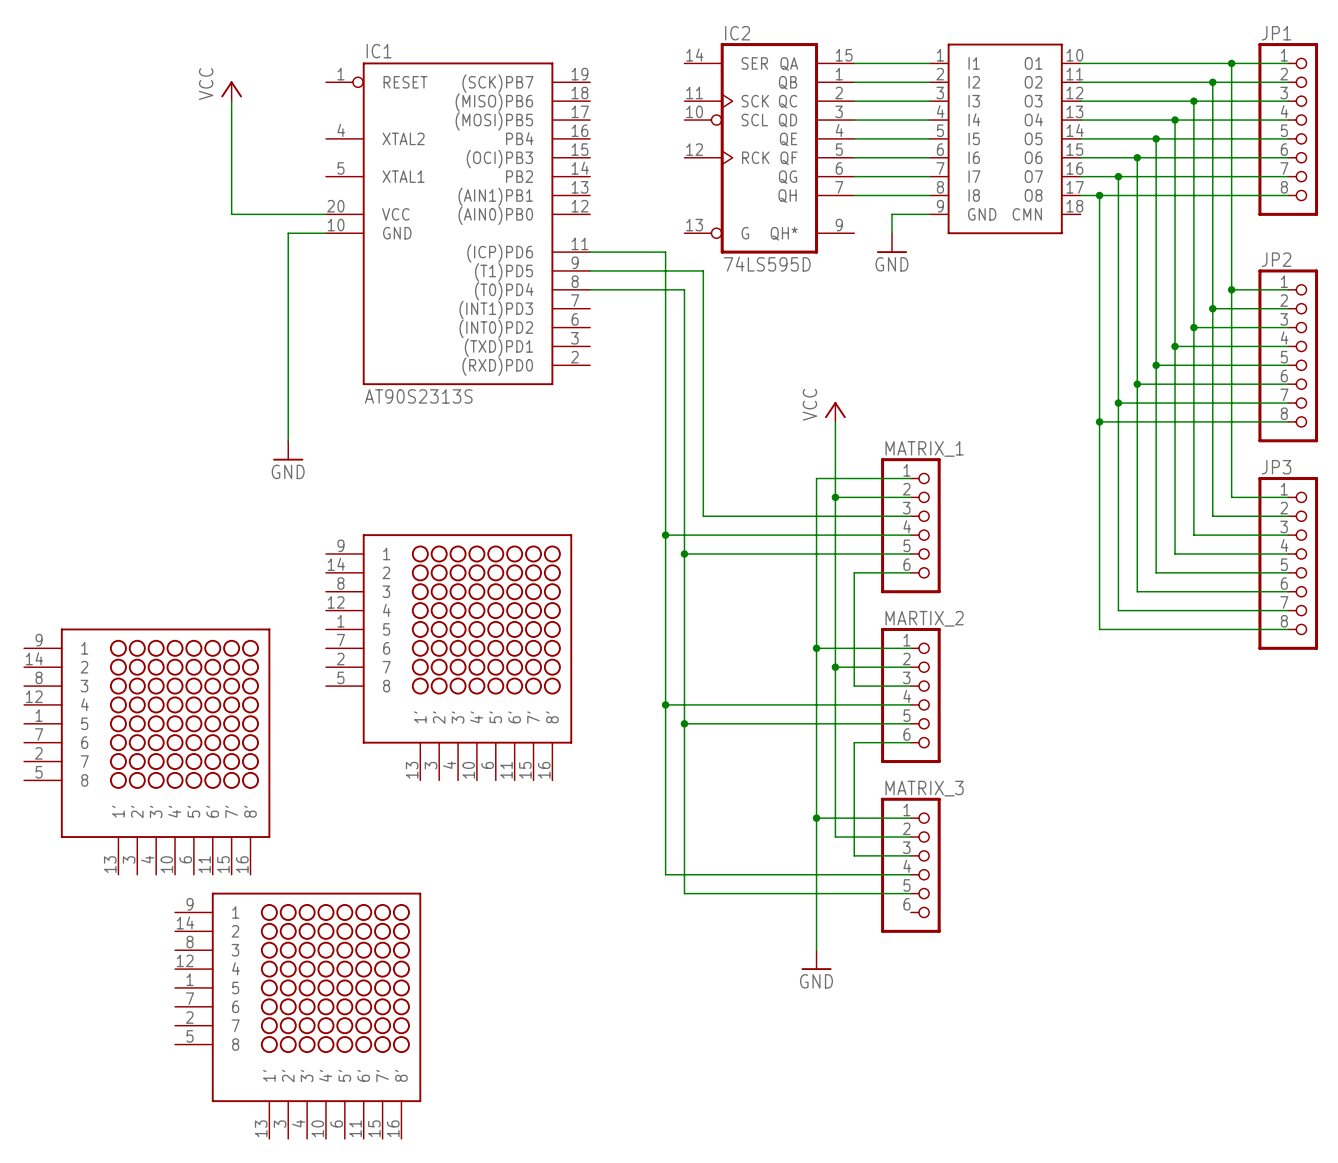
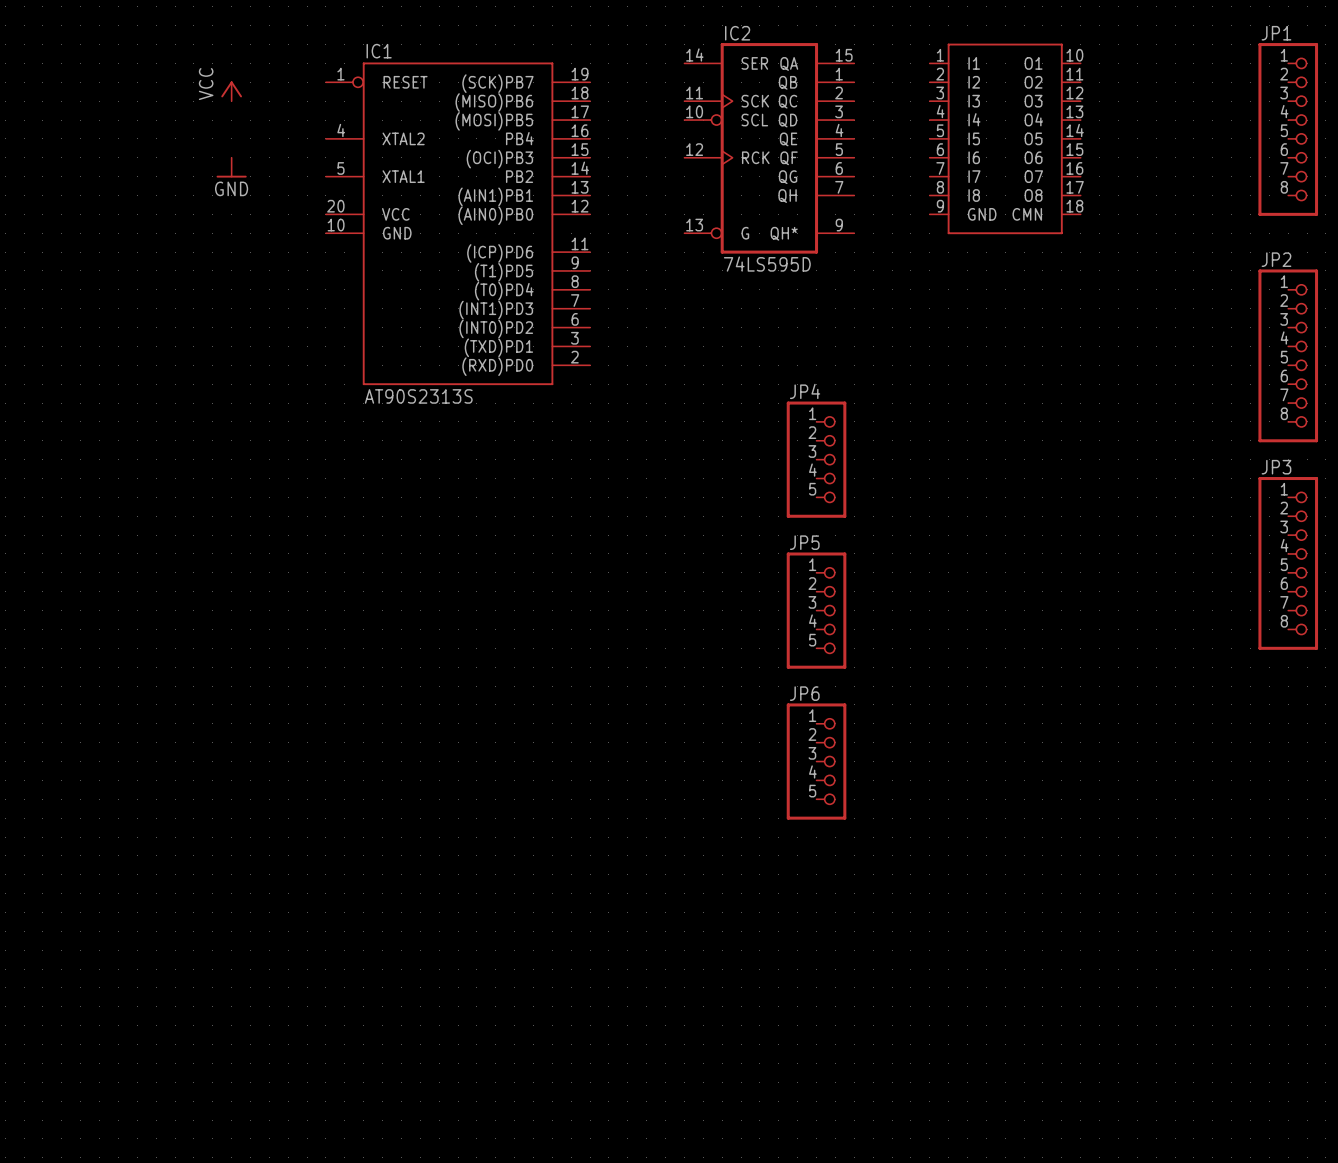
wire: (854, 63) (929, 63) -> none
wire: (1080, 63) (1288, 63) -> none
wire: (1231, 63) (1231, 497) (1288, 497) -> none
junction: (1231, 63) -> none
wire: (854, 82) (929, 82) -> none
wire: (1080, 82) (1288, 82) -> none
wire: (1212, 82) (1212, 516) (1288, 516) -> none
junction: (1212, 82) -> none
wire: (231, 101) (231, 214) (325, 214) -> none
wire: (854, 101) (929, 101) -> none
wire: (1080, 101) (1288, 101) -> none
wire: (1193, 101) (1193, 535) (1288, 535) -> none
junction: (1193, 101) -> none
wire: (854, 120) (929, 120) -> none
wire: (1080, 120) (1288, 120) -> none
wire: (1175, 120) (1175, 553) (1288, 553) -> none
junction: (1175, 120) -> none
wire: (854, 138) (929, 138) -> none
wire: (1080, 138) (1288, 138) -> none
wire: (1156, 138) (1156, 572) (1288, 572) -> none
junction: (1156, 138) -> none
wire: (854, 157) (929, 157) -> none
wire: (1080, 157) (1288, 157) -> none
wire: (1137, 157) (1137, 591) (1288, 591) -> none
junction: (1137, 157) -> none
power symbol: none -> GND (231, 167)
wire: (854, 176) (929, 176) -> none
wire: (1080, 176) (1288, 176) -> none
wire: (1118, 176) (1118, 610) (1288, 610) -> none
junction: (1118, 176) -> none
wire: (854, 195) (929, 195) -> none
wire: (1080, 195) (1288, 195) -> none
wire: (1099, 195) (1099, 629) (1288, 629) -> none
junction: (1099, 195) -> none
wire: (929, 214) (892, 214) (892, 233) -> none
wire: (325, 233) (288, 233) (288, 440) -> none
power symbol: GND (892, 243) -> none
wire: (590, 252) (665, 252) (665, 874) (910, 874) -> none
wire: (590, 270) (703, 270) (703, 516) (910, 516) -> none
wire: (590, 289) (684, 289) (684, 893) (910, 893) -> none
wire: (1231, 289) (1288, 289) -> none
junction: (1231, 289) -> none
wire: (1212, 308) (1288, 308) -> none
junction: (1212, 308) -> none
wire: (1193, 327) (1288, 327) -> none
junction: (1193, 327) -> none
wire: (1175, 346) (1288, 346) -> none
junction: (1175, 346) -> none
wire: (1156, 365) (1288, 365) -> none
junction: (1156, 365) -> none
wire: (1137, 384) (1288, 384) -> none
junction: (1137, 384) -> none
wire: (1118, 403) (1288, 403) -> none
junction: (1118, 403) -> none
power symbol: VCC (835, 412) -> none
wire: (835, 421) (835, 837) (910, 837) -> none
wire: (1099, 421) (1288, 421) -> none
junction: (1099, 421) -> none
power symbol: GND (288, 450) -> none
JP4: none -> (816, 459)
wire: (910, 478) (816, 478) (816, 950) -> none
wire: (835, 497) (910, 497) -> none
junction: (835, 497) -> none
MATRIX_1: (910, 525) -> none
wire: (665, 535) (910, 535) -> none
junction: (665, 535) -> none
wire: (684, 553) (910, 553) -> none
junction: (684, 553) -> none
wire: (910, 572) (854, 572) (854, 686) (910, 686) -> none
JP5: none -> (816, 610)
wire: (816, 648) (910, 648) -> none
junction: (816, 648) -> none
part: (449, 657) -> none
wire: (835, 667) (910, 667) -> none
junction: (835, 667) -> none
MARTIX_2: (910, 695) -> none
wire: (665, 704) (910, 704) -> none
junction: (665, 704) -> none
wire: (684, 723) (910, 723) -> none
junction: (684, 723) -> none
wire: (910, 742) (854, 742) (854, 855) (910, 855) -> none
part: (147, 751) -> none
JP6: none -> (816, 761)
wire: (816, 818) (910, 818) -> none
junction: (816, 818) -> none
MATRIX_3: (910, 865) -> none
power symbol: GND (816, 960) -> none
part: (298, 1015) -> none

